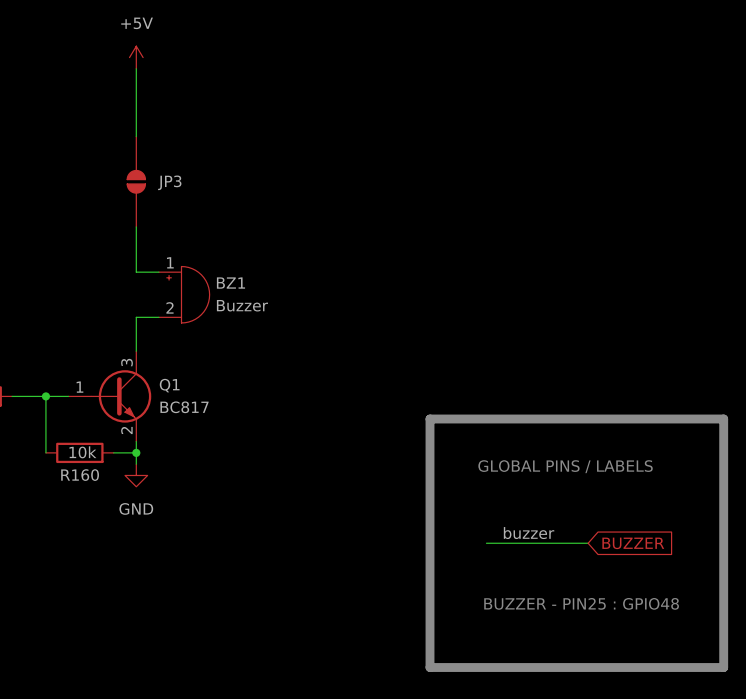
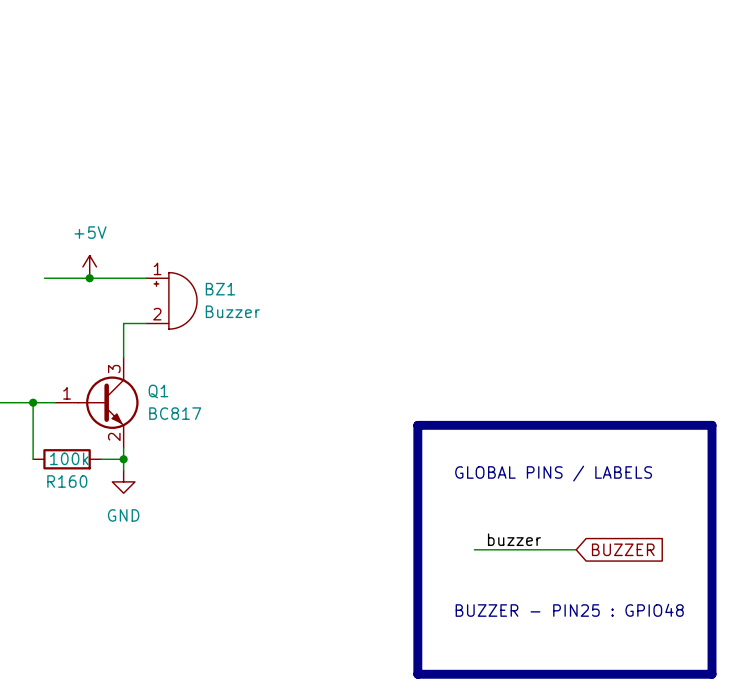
power symbol position: +5V (136, 57) -> +5V (89, 266)
wire: (136, 68) (136, 136) -> none
JP3: (136, 181) -> none
wire: (136, 226) (136, 272) -> (44, 278) (123, 278)
junction: none -> (89, 278)
R160 value: 10k (82, 452) -> 100k (69, 458)

